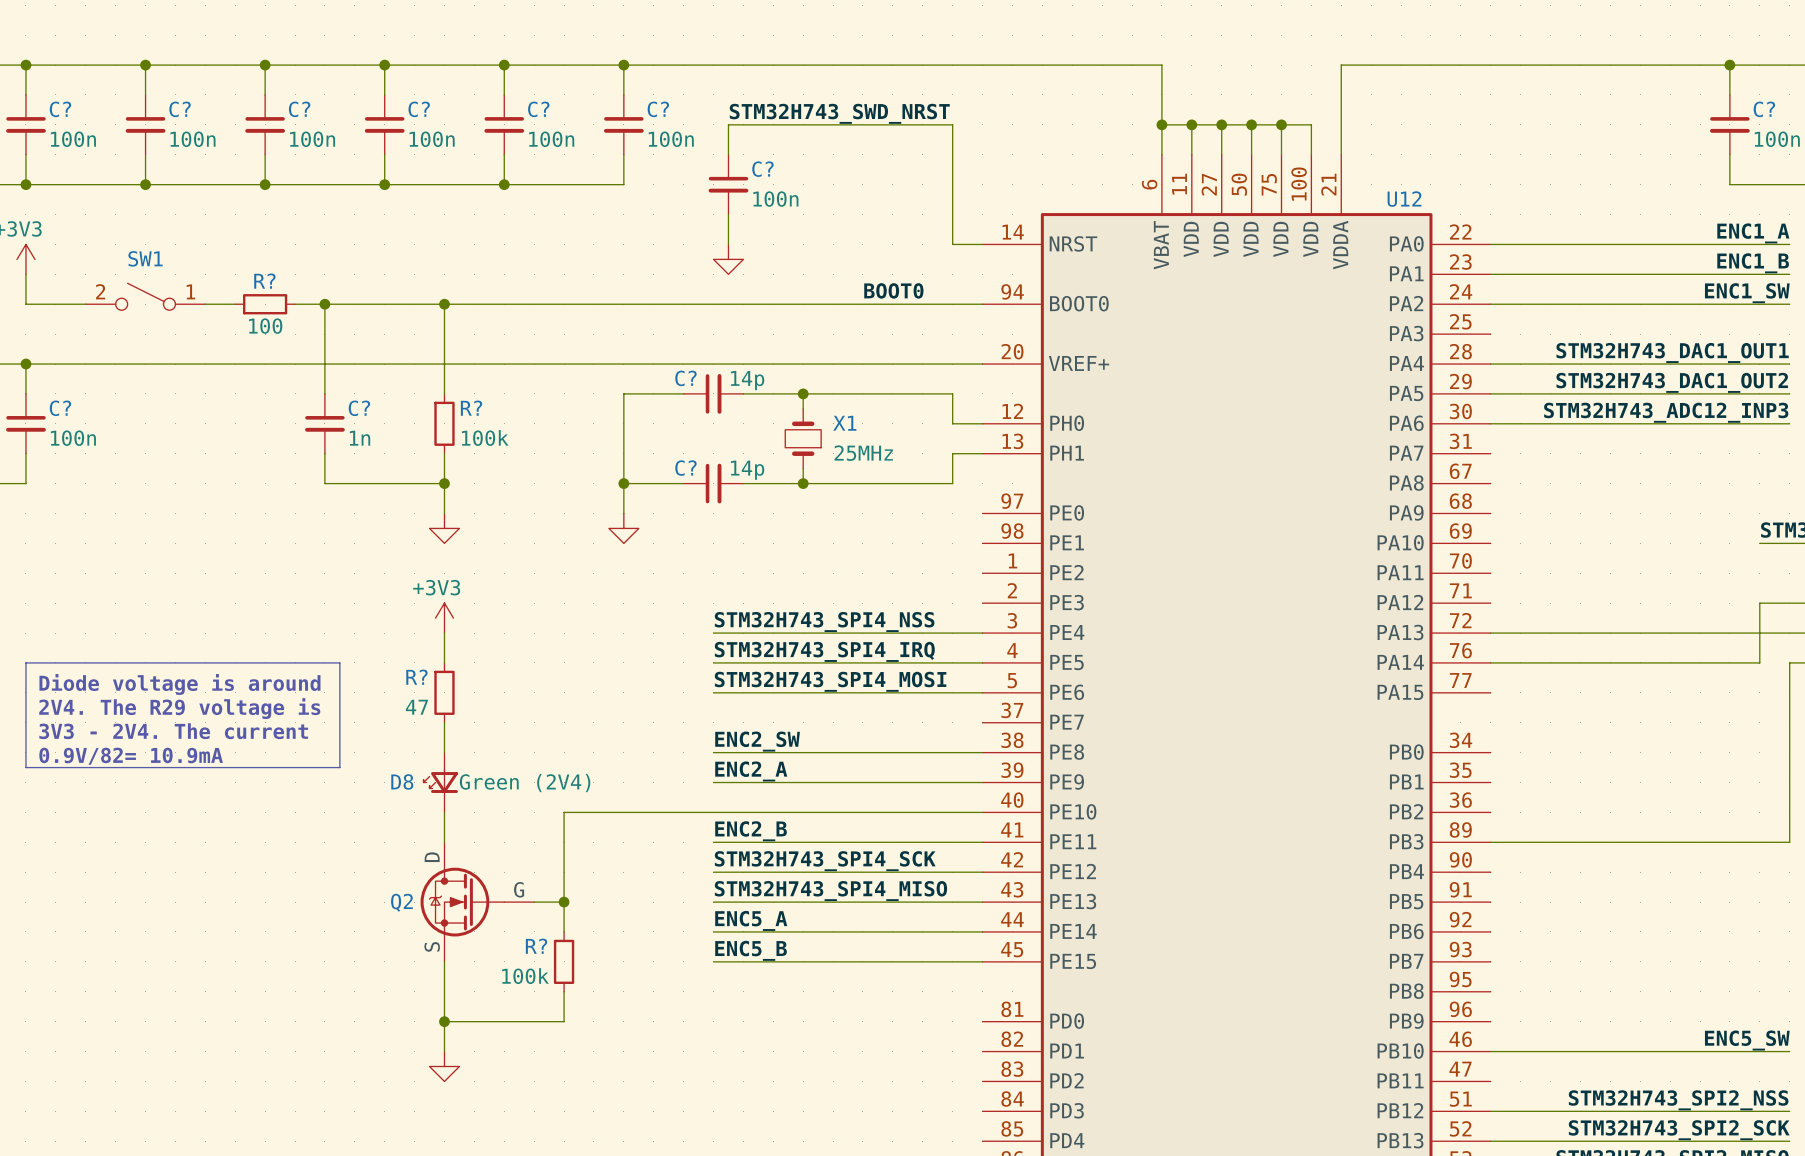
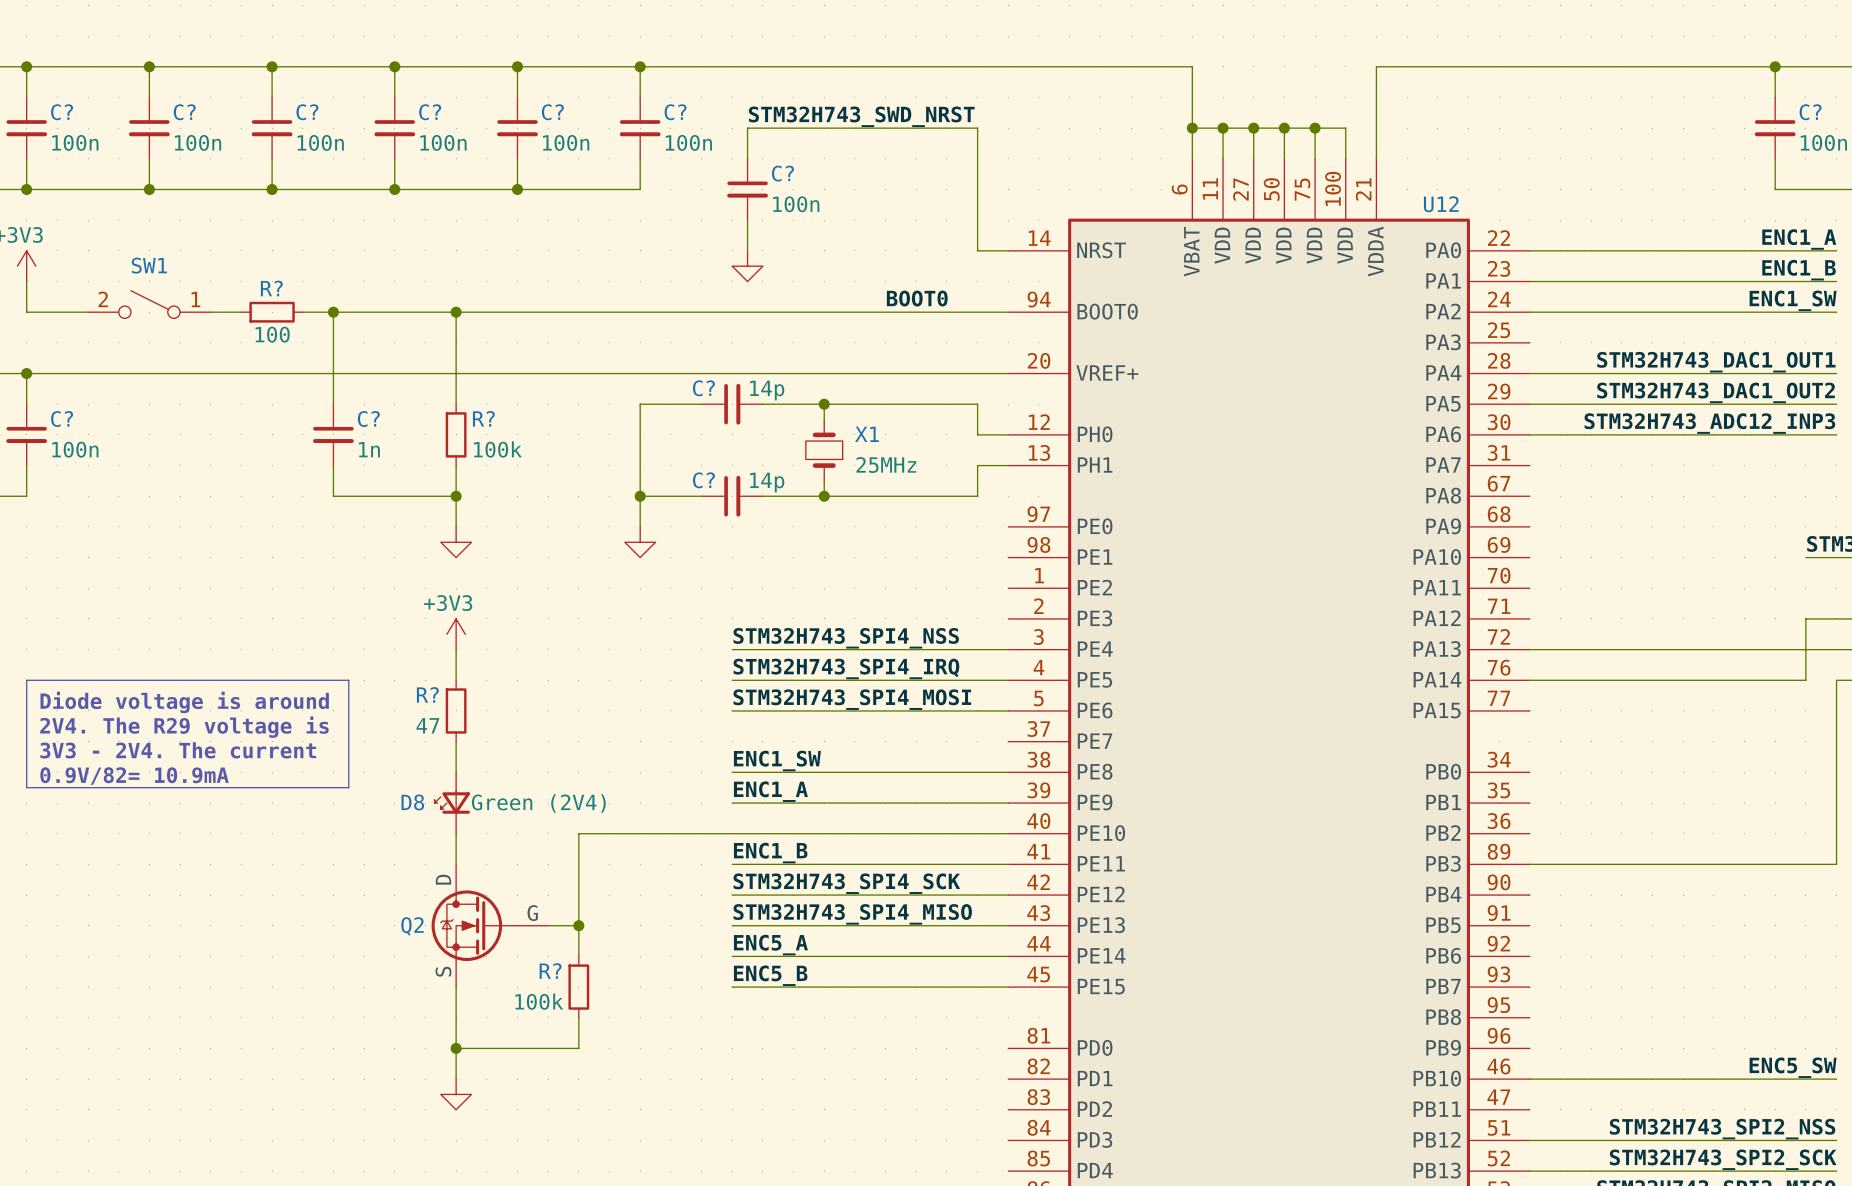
label: ENC2_SW (757, 741) -> ENC1_SW (777, 760)
label: ENC2_A (751, 771) -> ENC1_A (770, 791)
label: ENC2_B (751, 831) -> ENC1_B (770, 853)

